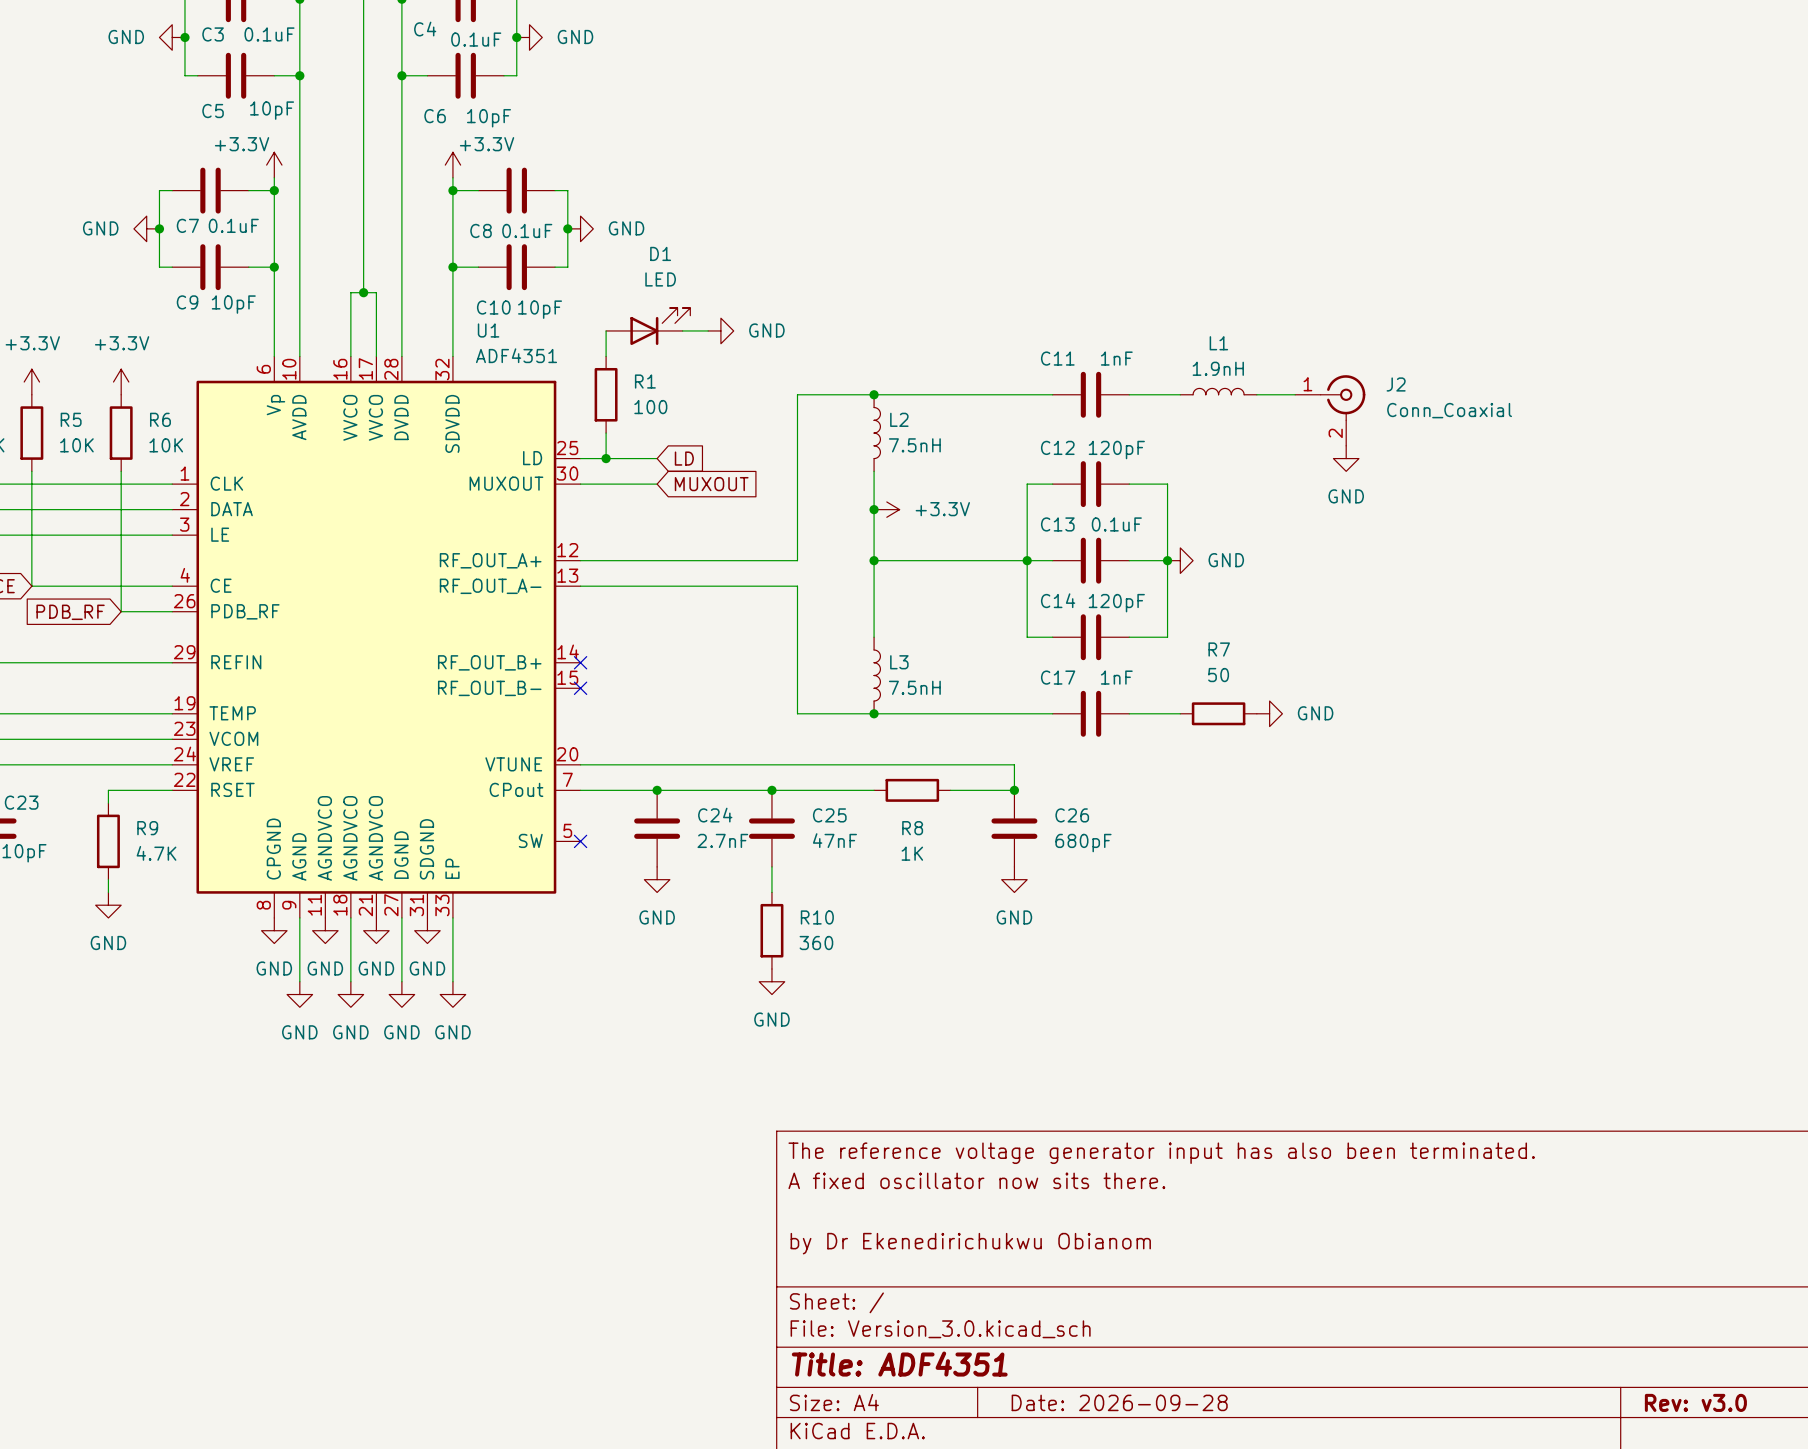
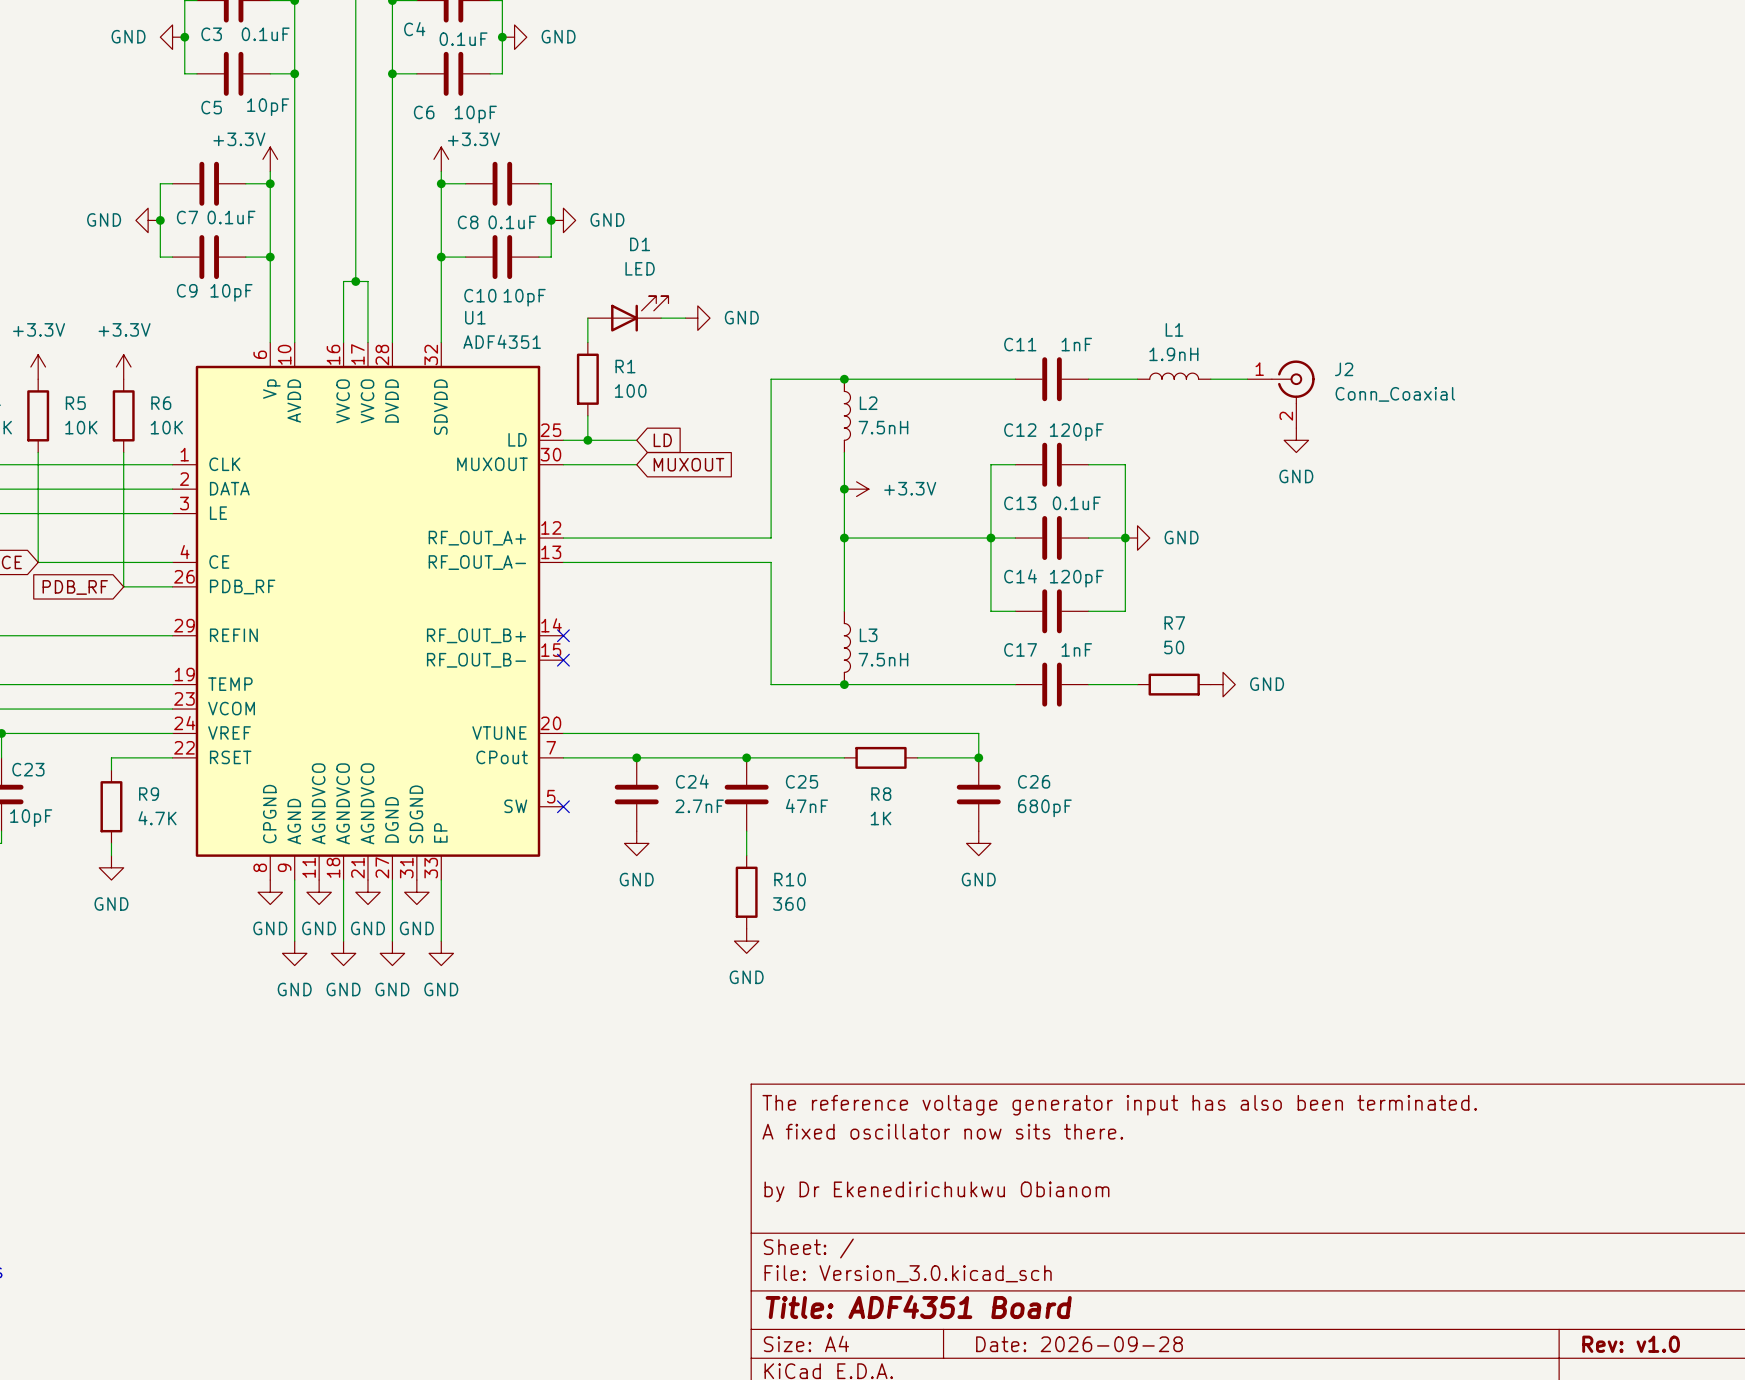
title block: Title: ADF4351 (899, 1364) -> Title: ADF4351 Board (918, 1307)
title block: Rev: v3.0 (1695, 1402) -> Rev: v1.0 (1631, 1344)

